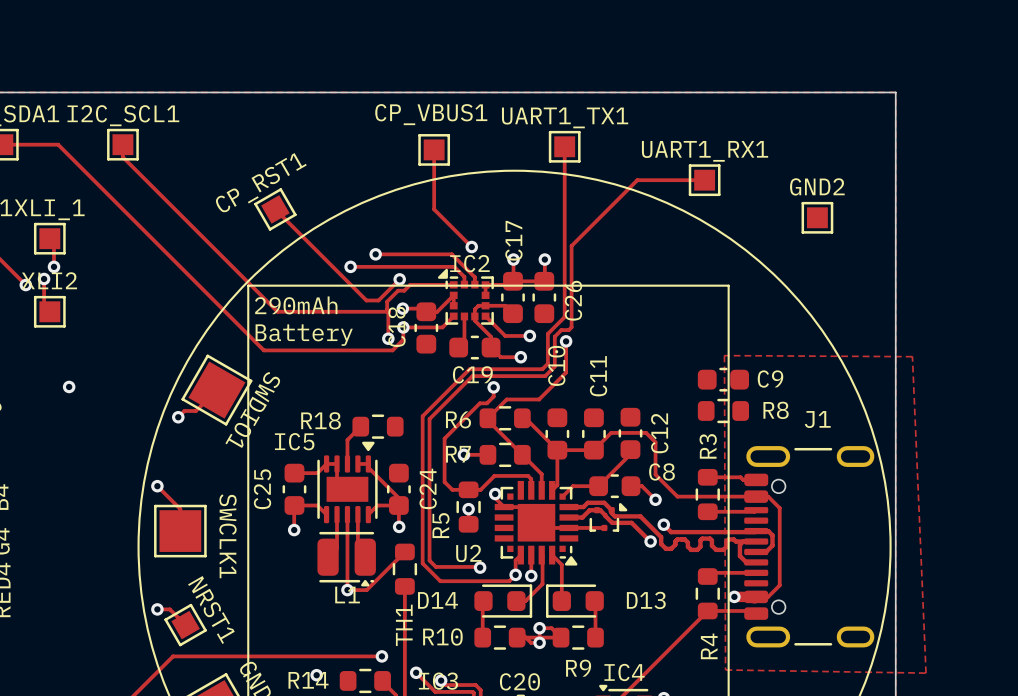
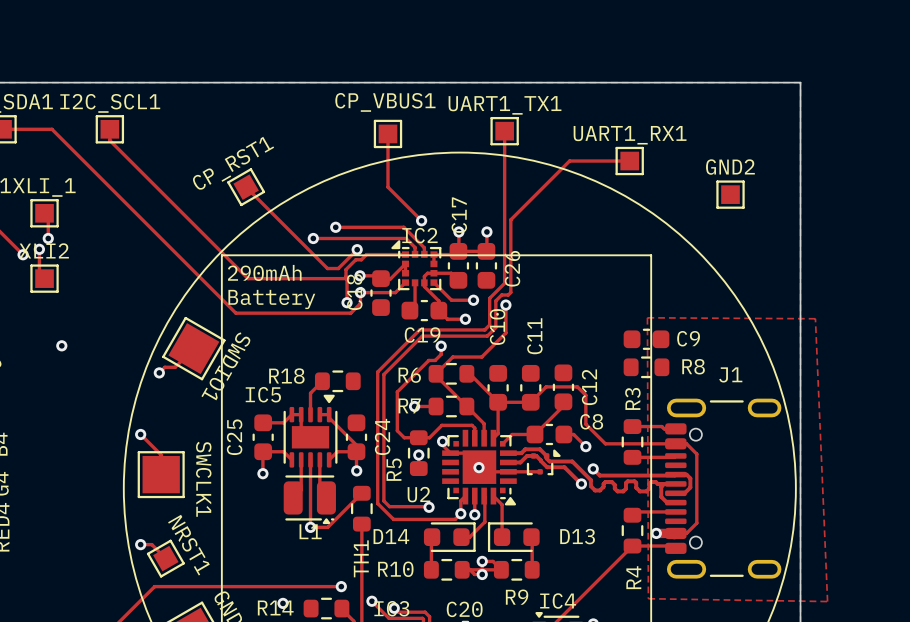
via: none -> (478, 467)

